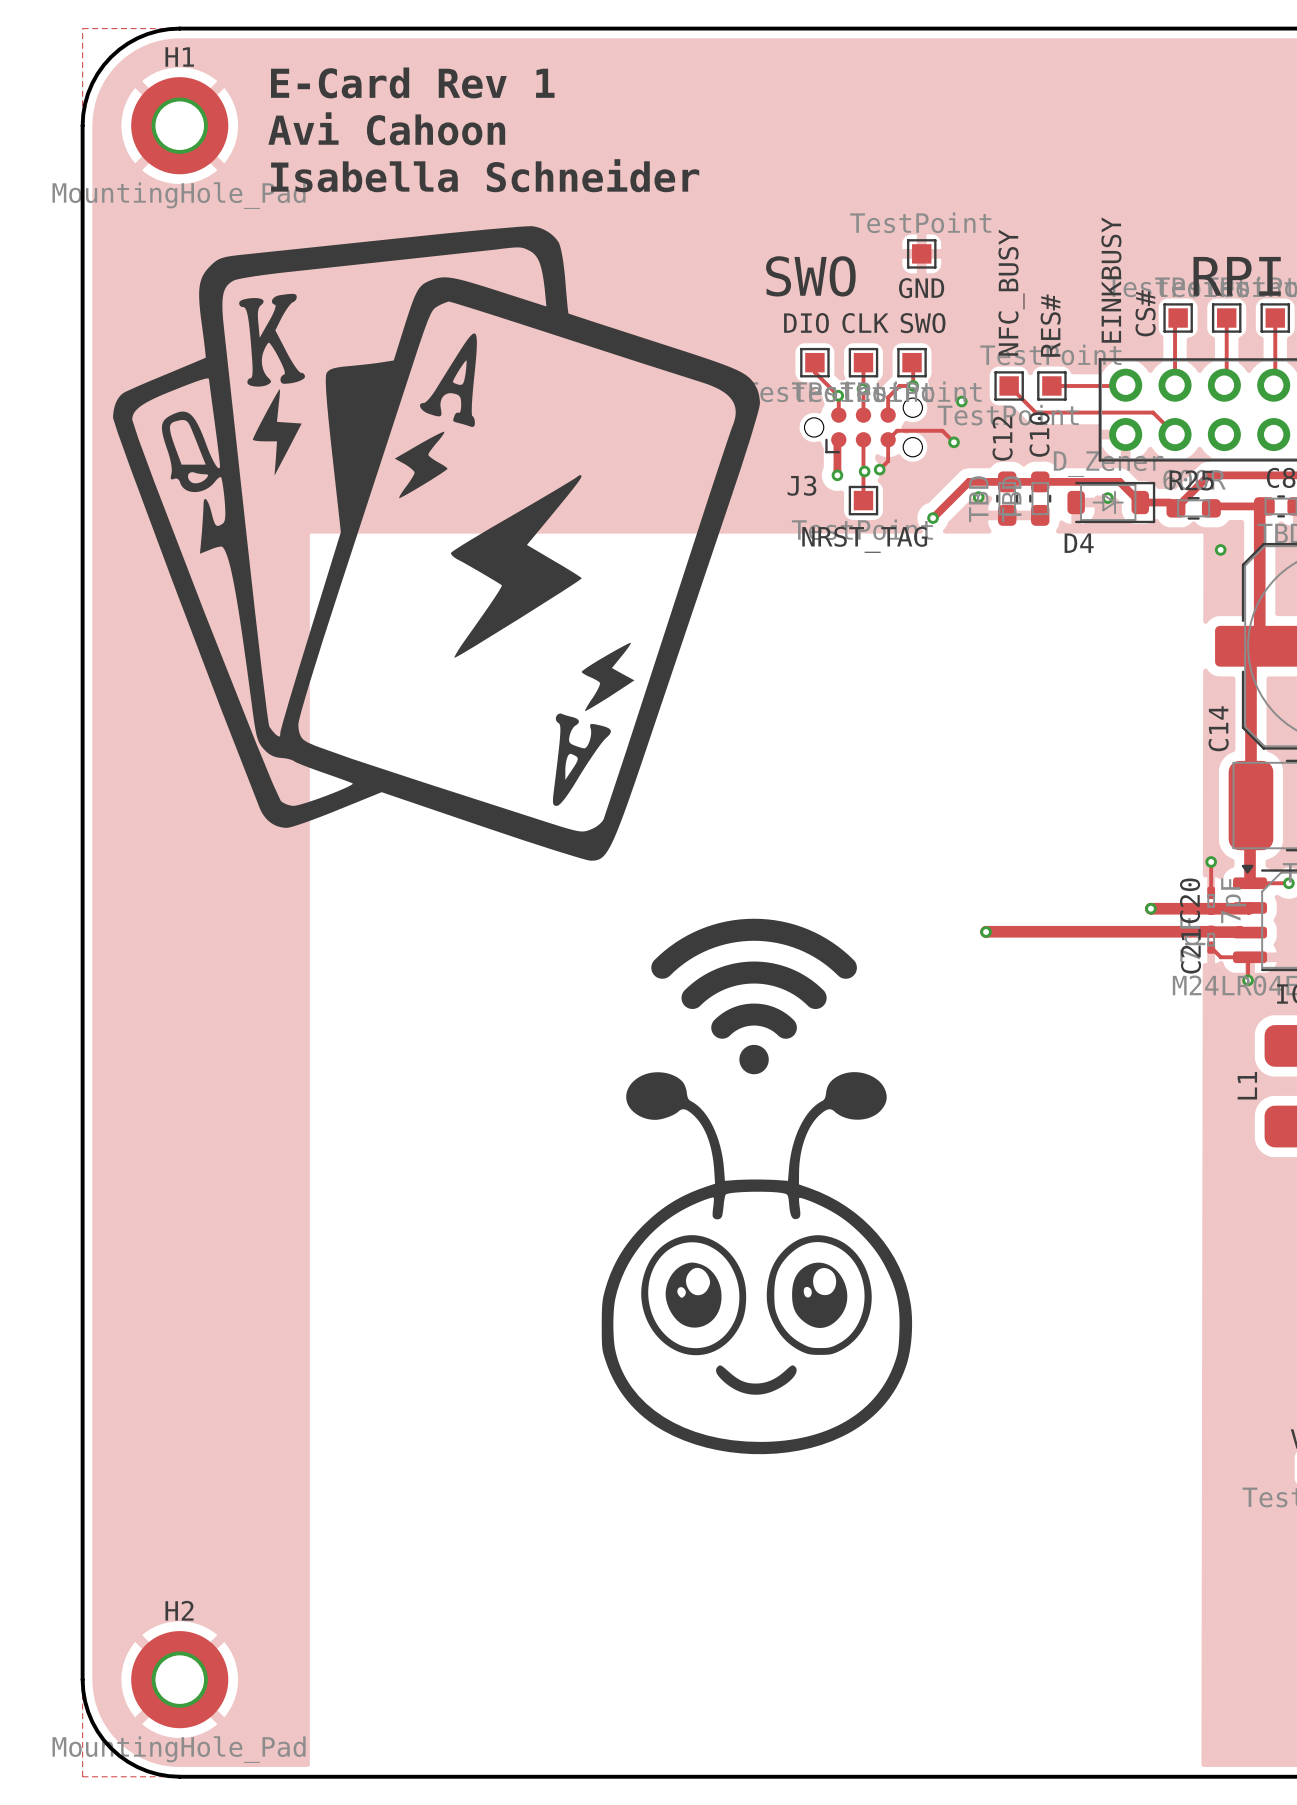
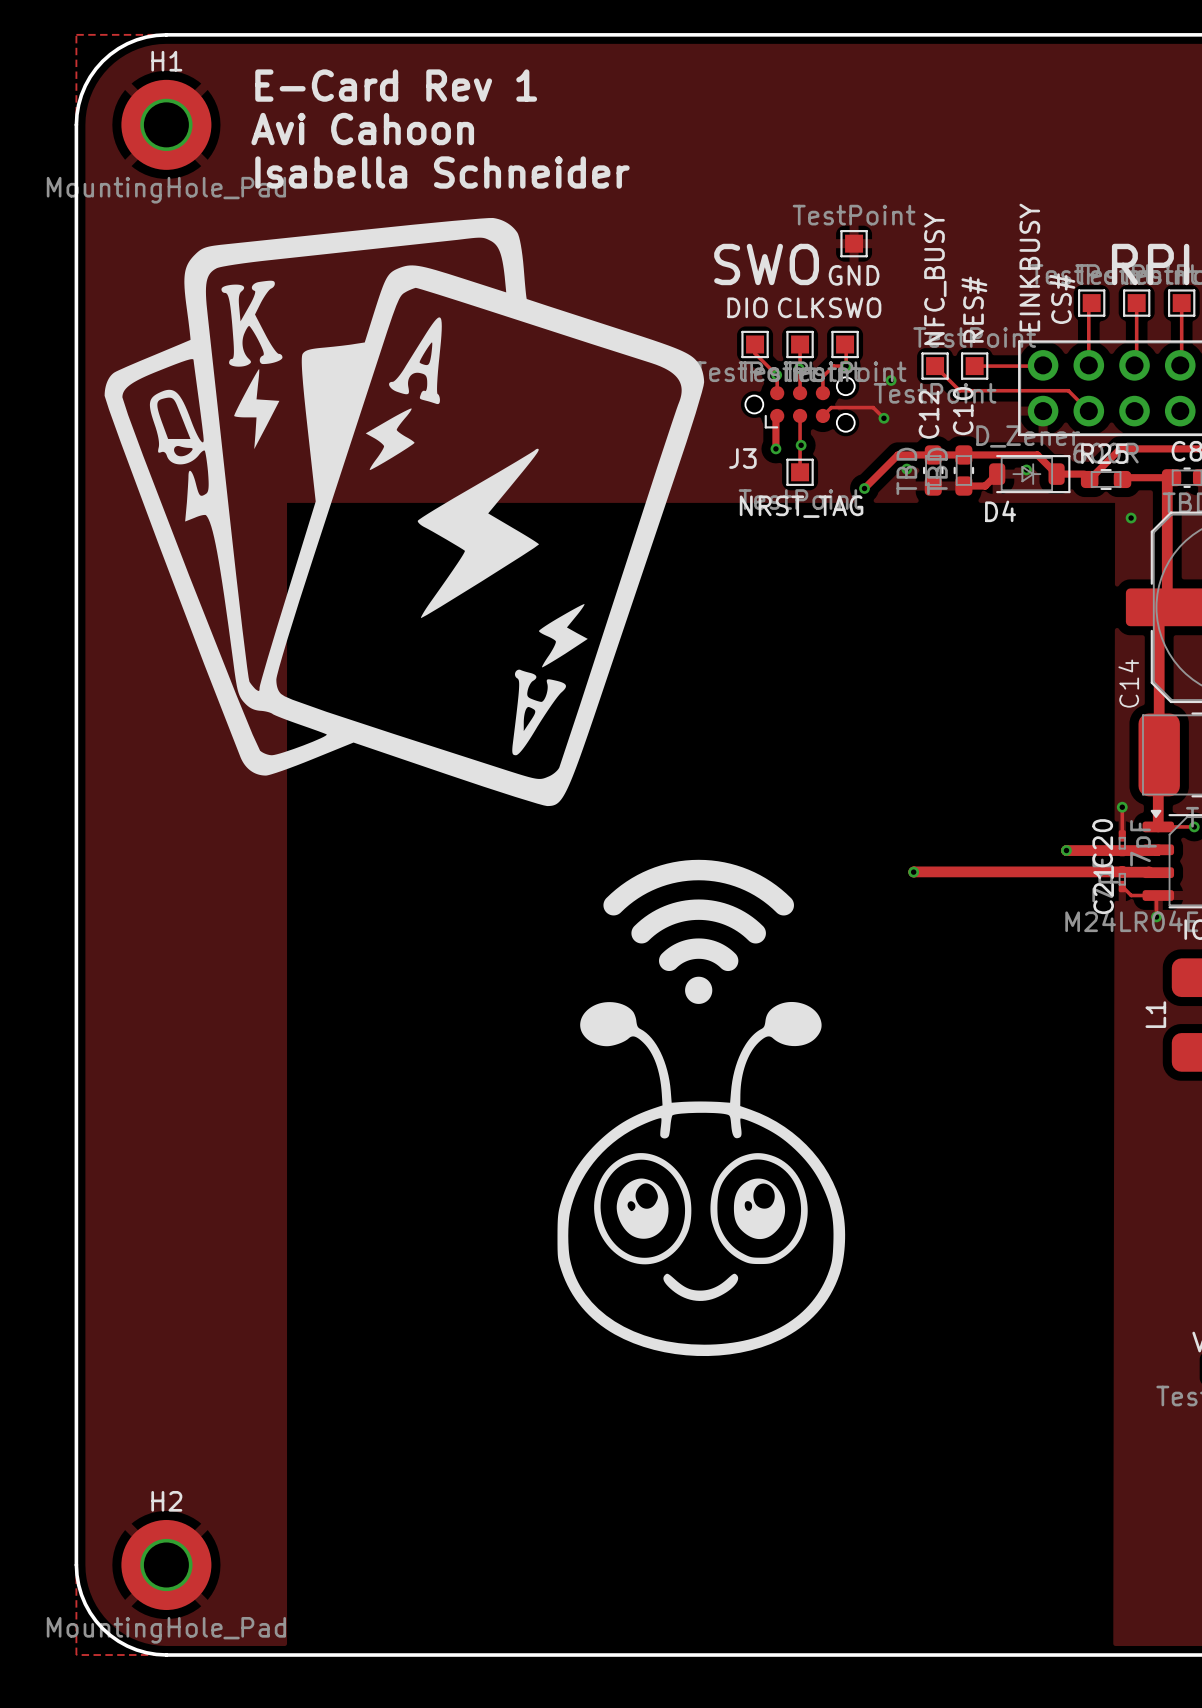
track: (888, 439) (888, 461) (879, 469) -> none
via: (879, 469) -> none
track: none -> (997, 474) (985, 486) (963, 486)

